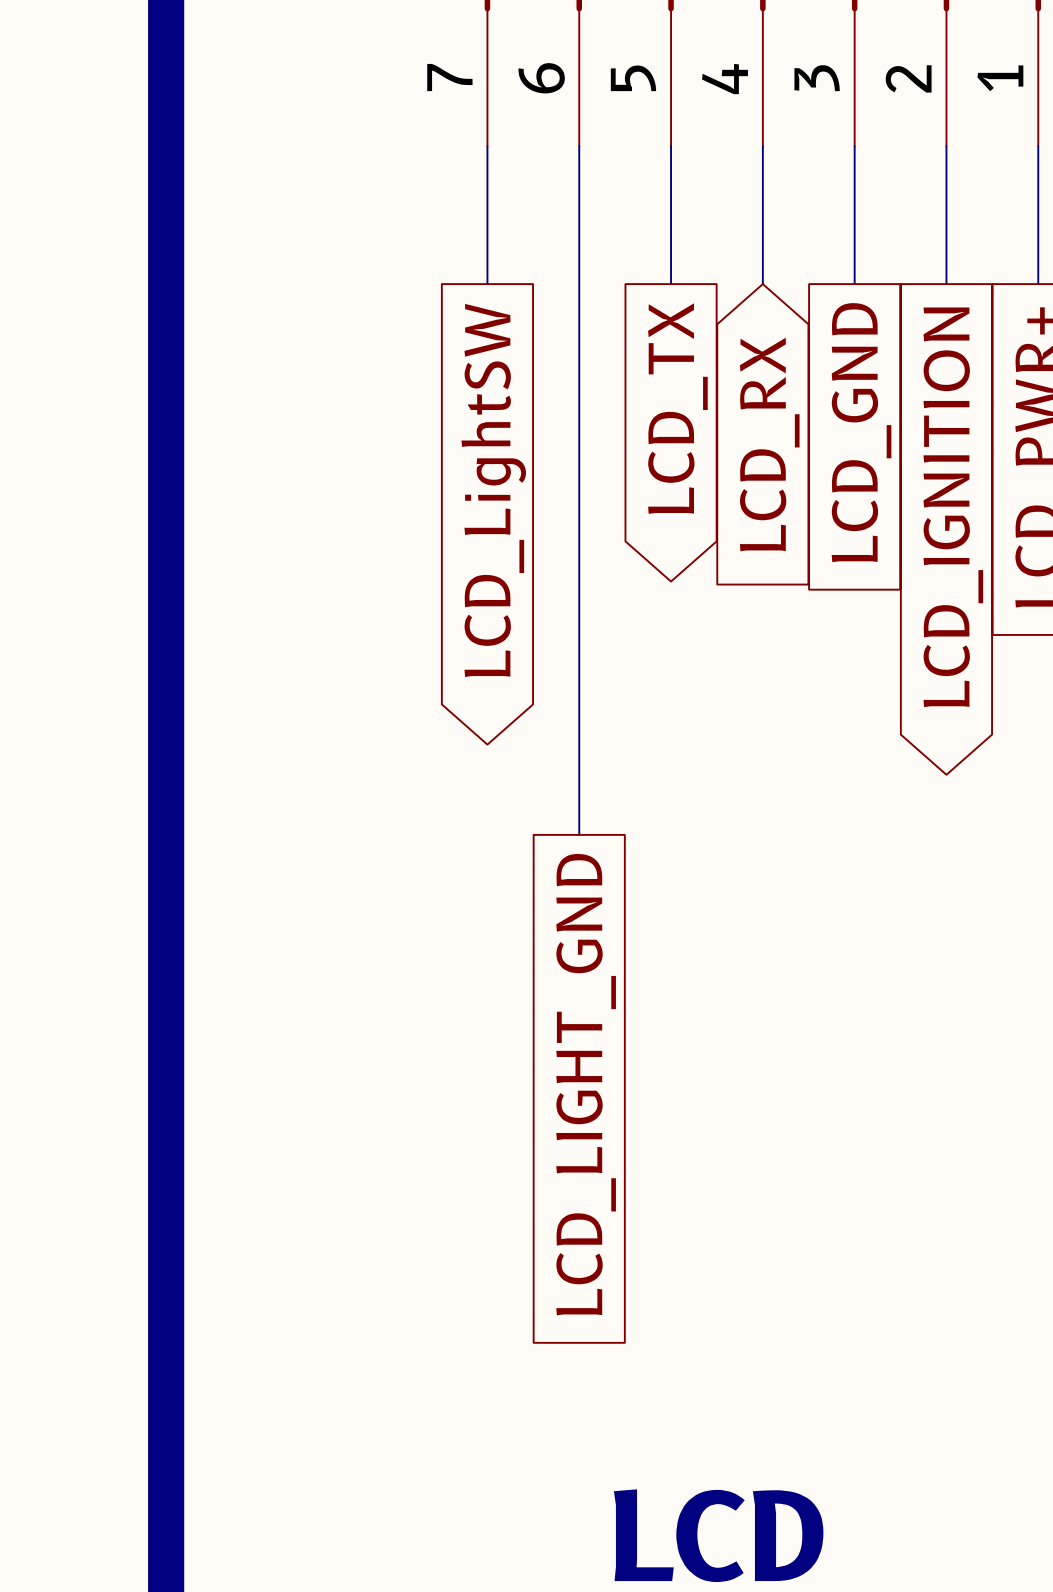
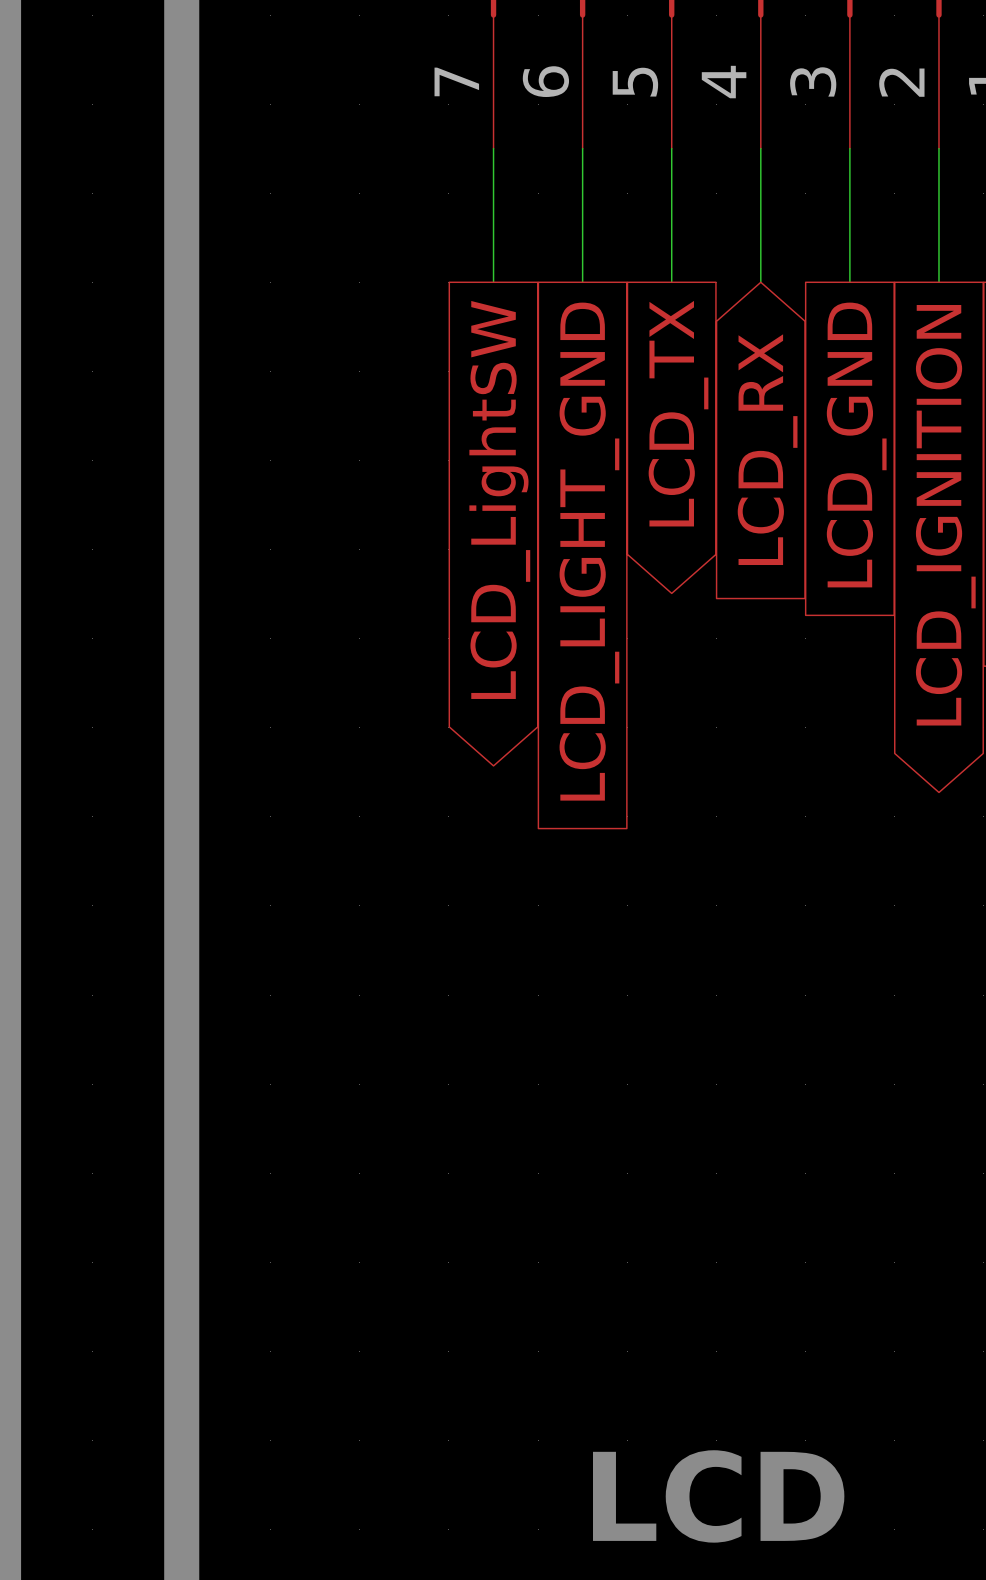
wire: (579, 284) (579, 834) -> none
global label position: LCD_LIGHT_GND (586, 1084) -> LCD_LIGHT_GND (589, 551)

